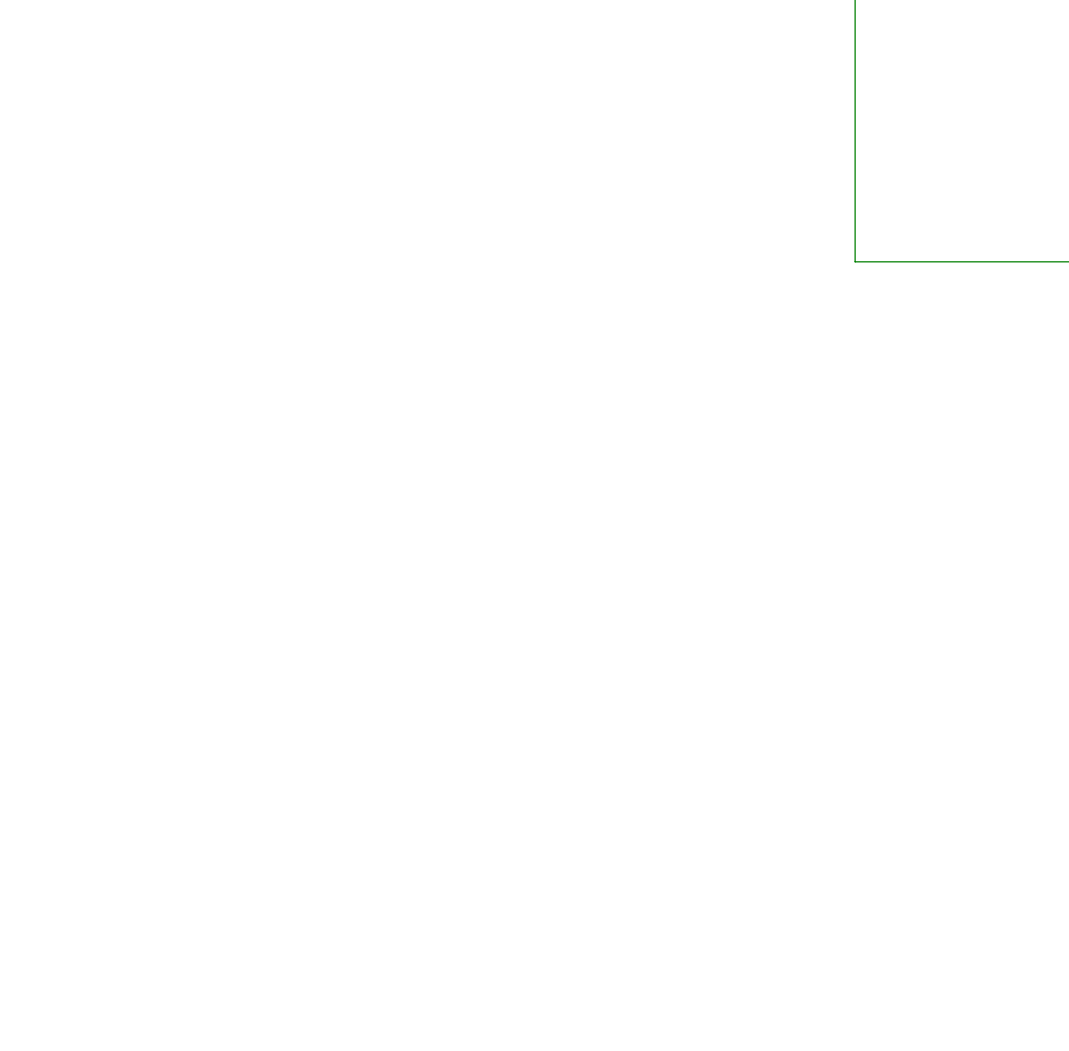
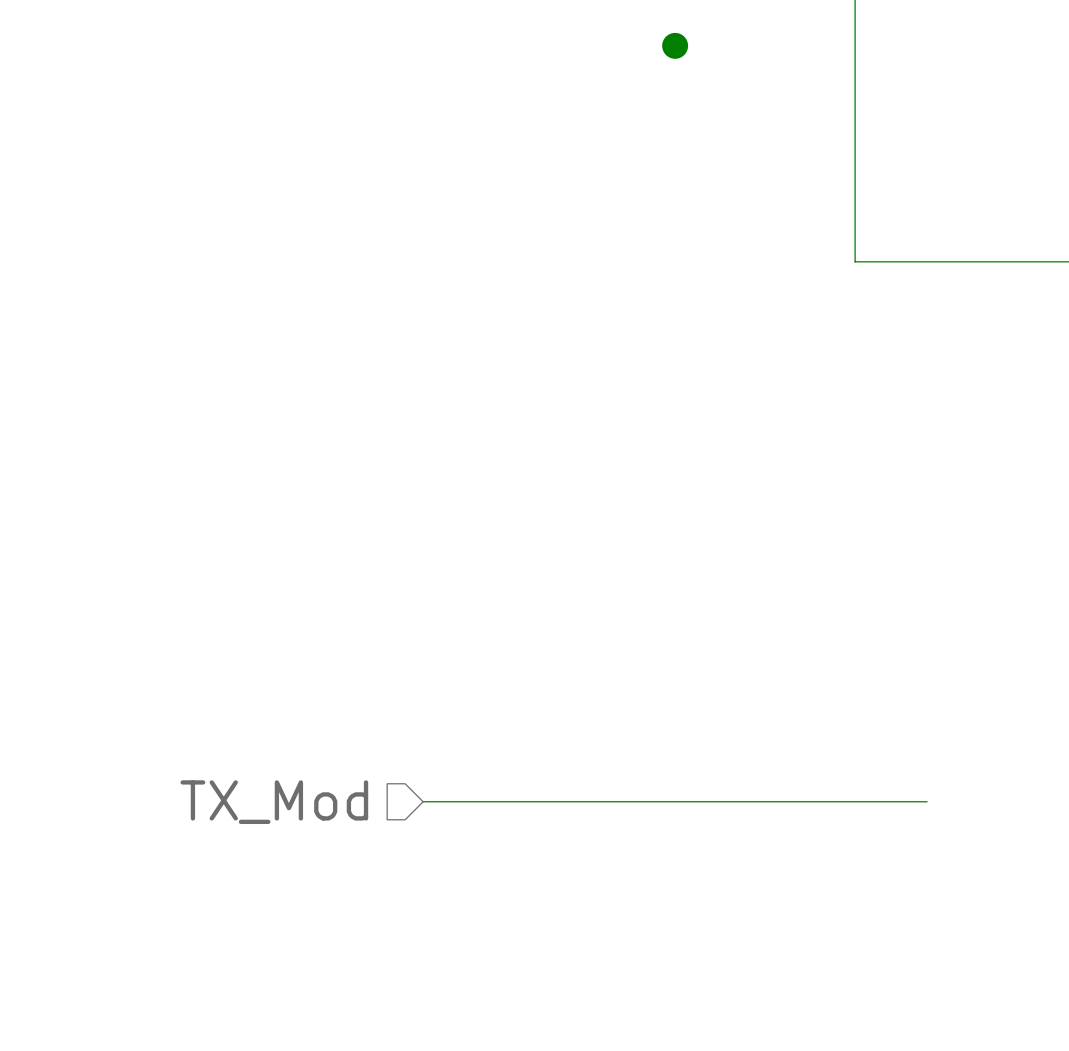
junction: none -> (675, 45)
wire: none -> (423, 801) (927, 801)
hierarchical label: none -> TX_Mod (274, 802)

